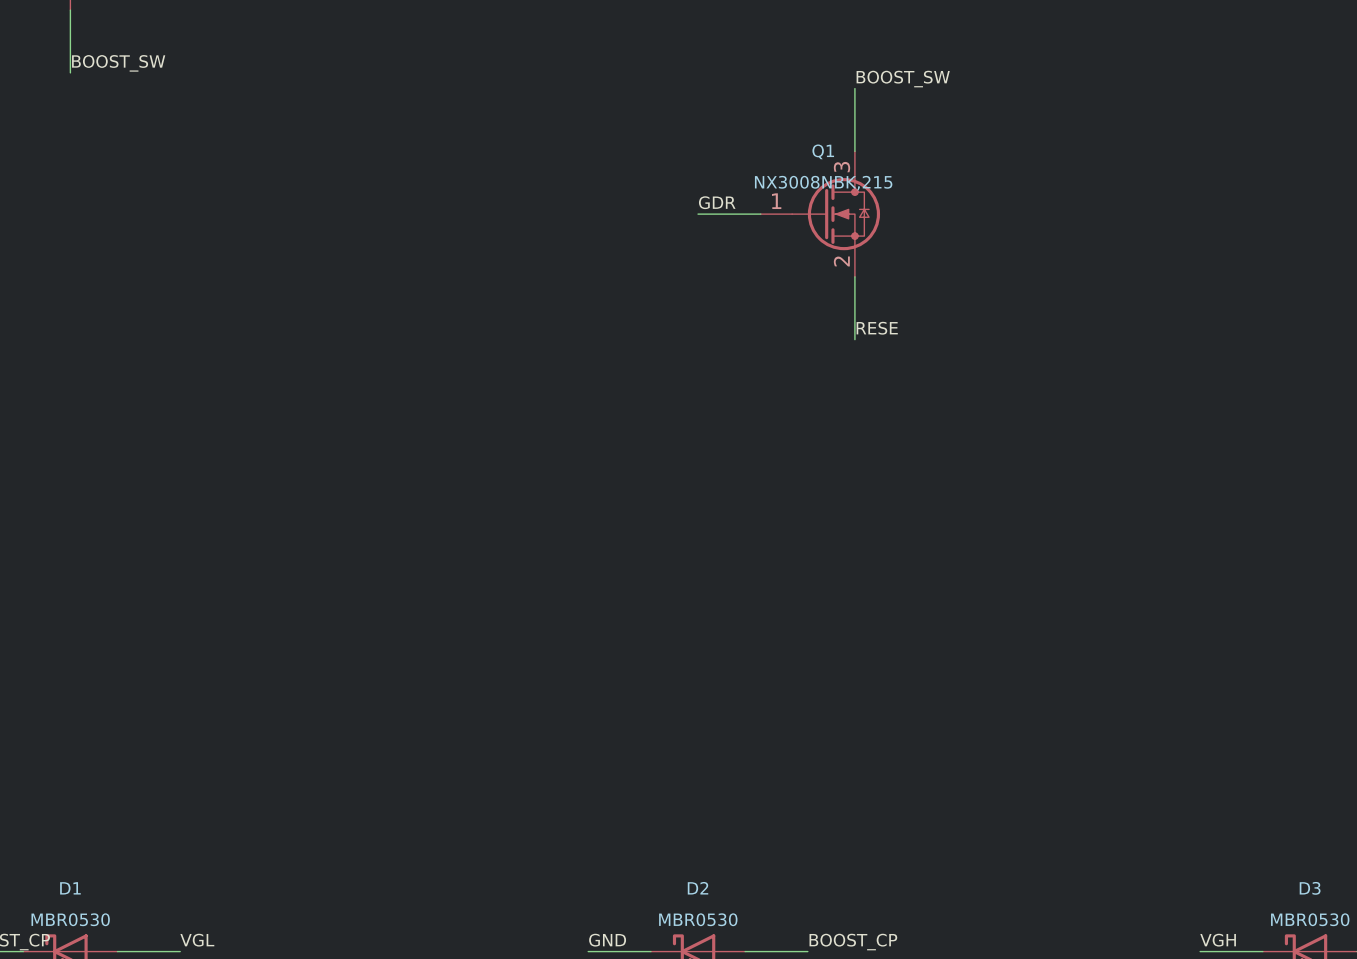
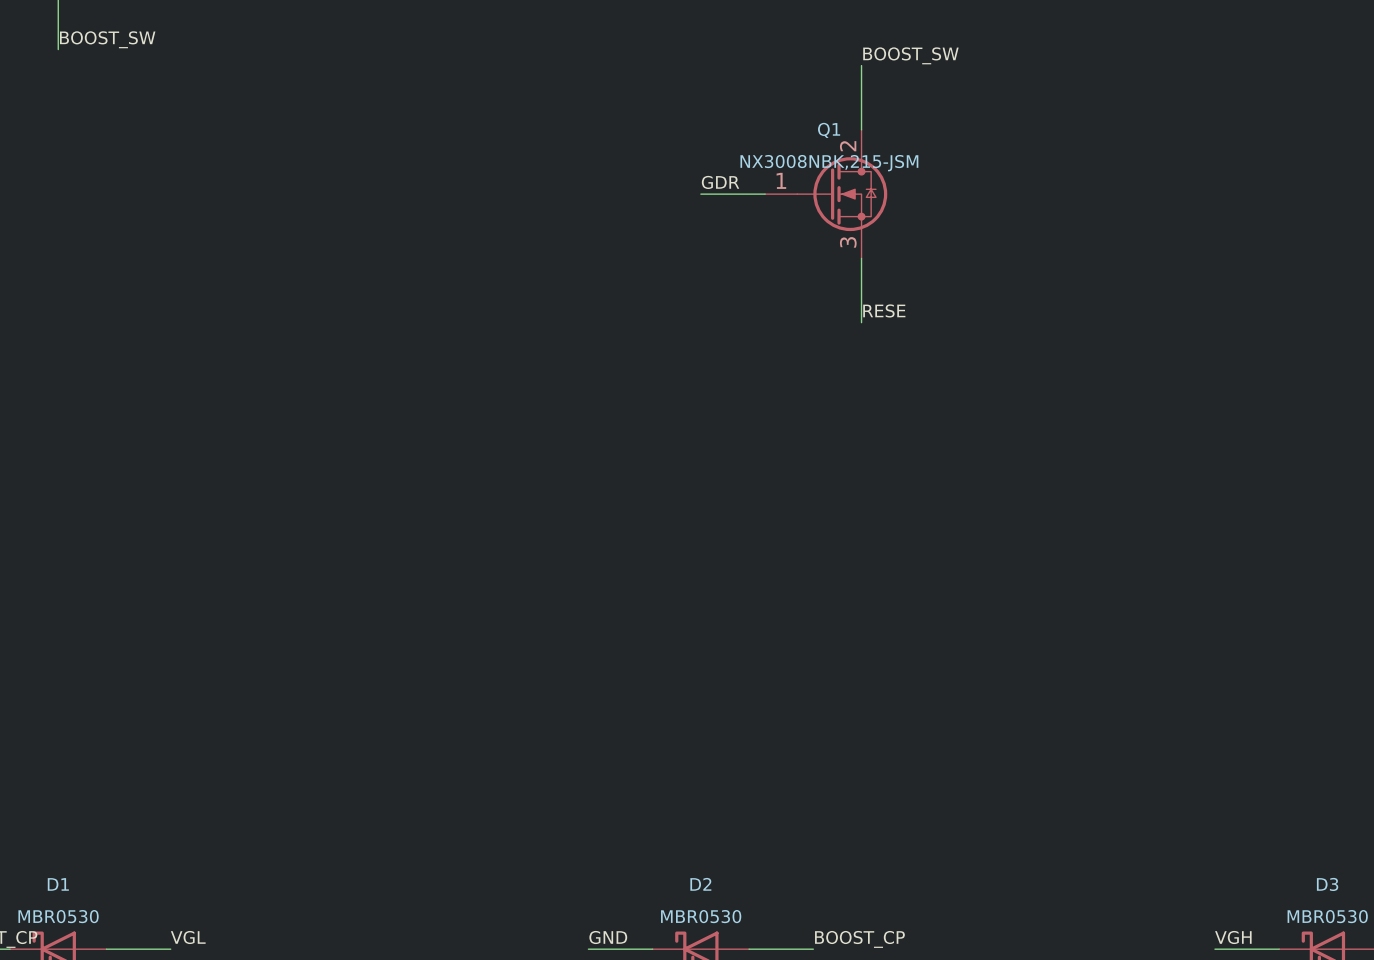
Q1 pin number: 3 (842, 167) -> 2 (848, 146)
Q1 value: NX3008NBK,215 (823, 183) -> NX3008NBK,215-JSM (829, 163)
Q1 pin number: 2 (841, 261) -> 3 (848, 242)

